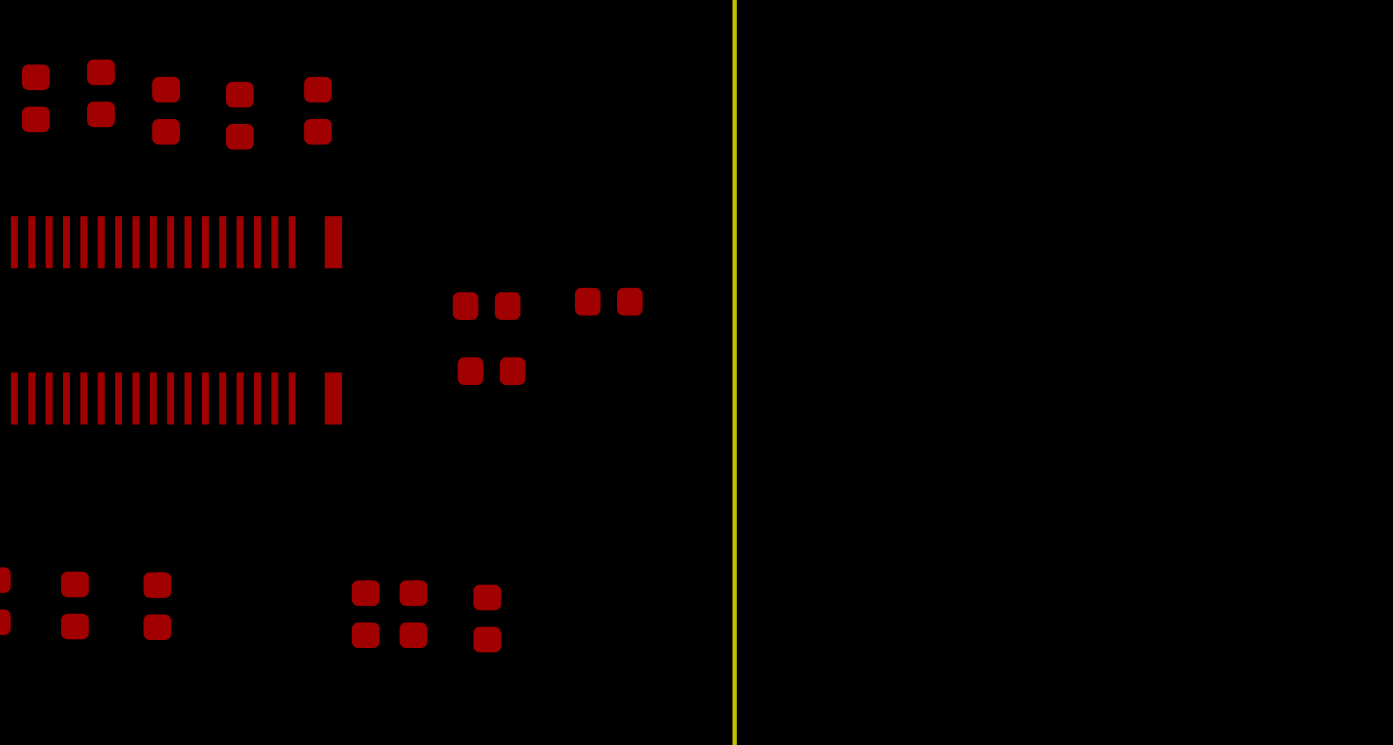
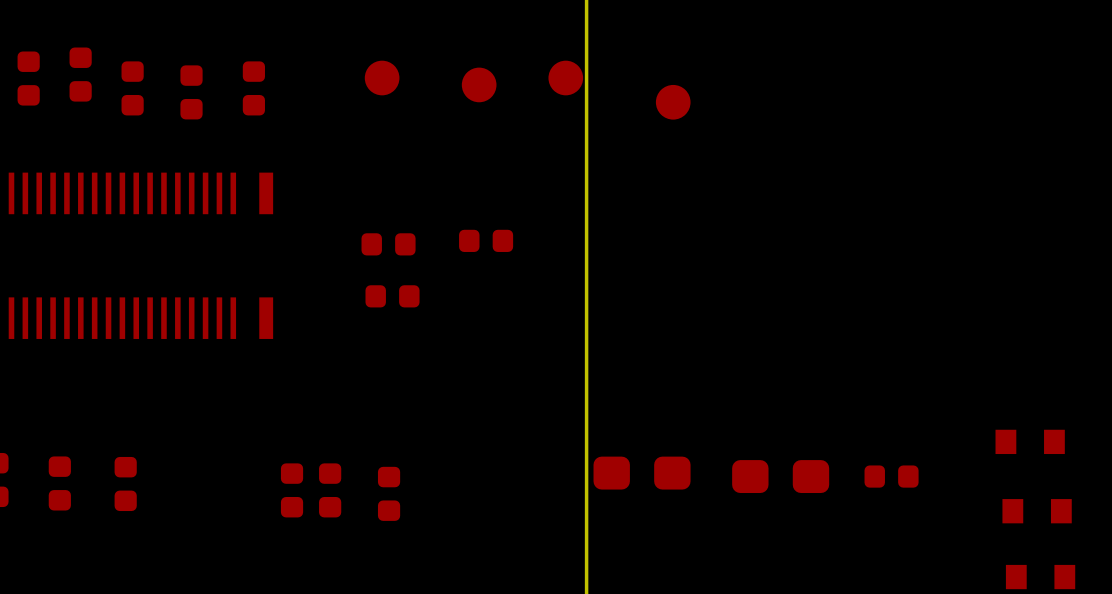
part: none -> (382, 78)
part: none -> (565, 78)
part: none -> (479, 84)
part: none -> (673, 102)
part: none -> (1030, 441)
part: none -> (642, 473)
part: none -> (780, 476)
part: none -> (891, 476)
part: none -> (1037, 511)
part: none -> (1040, 577)

